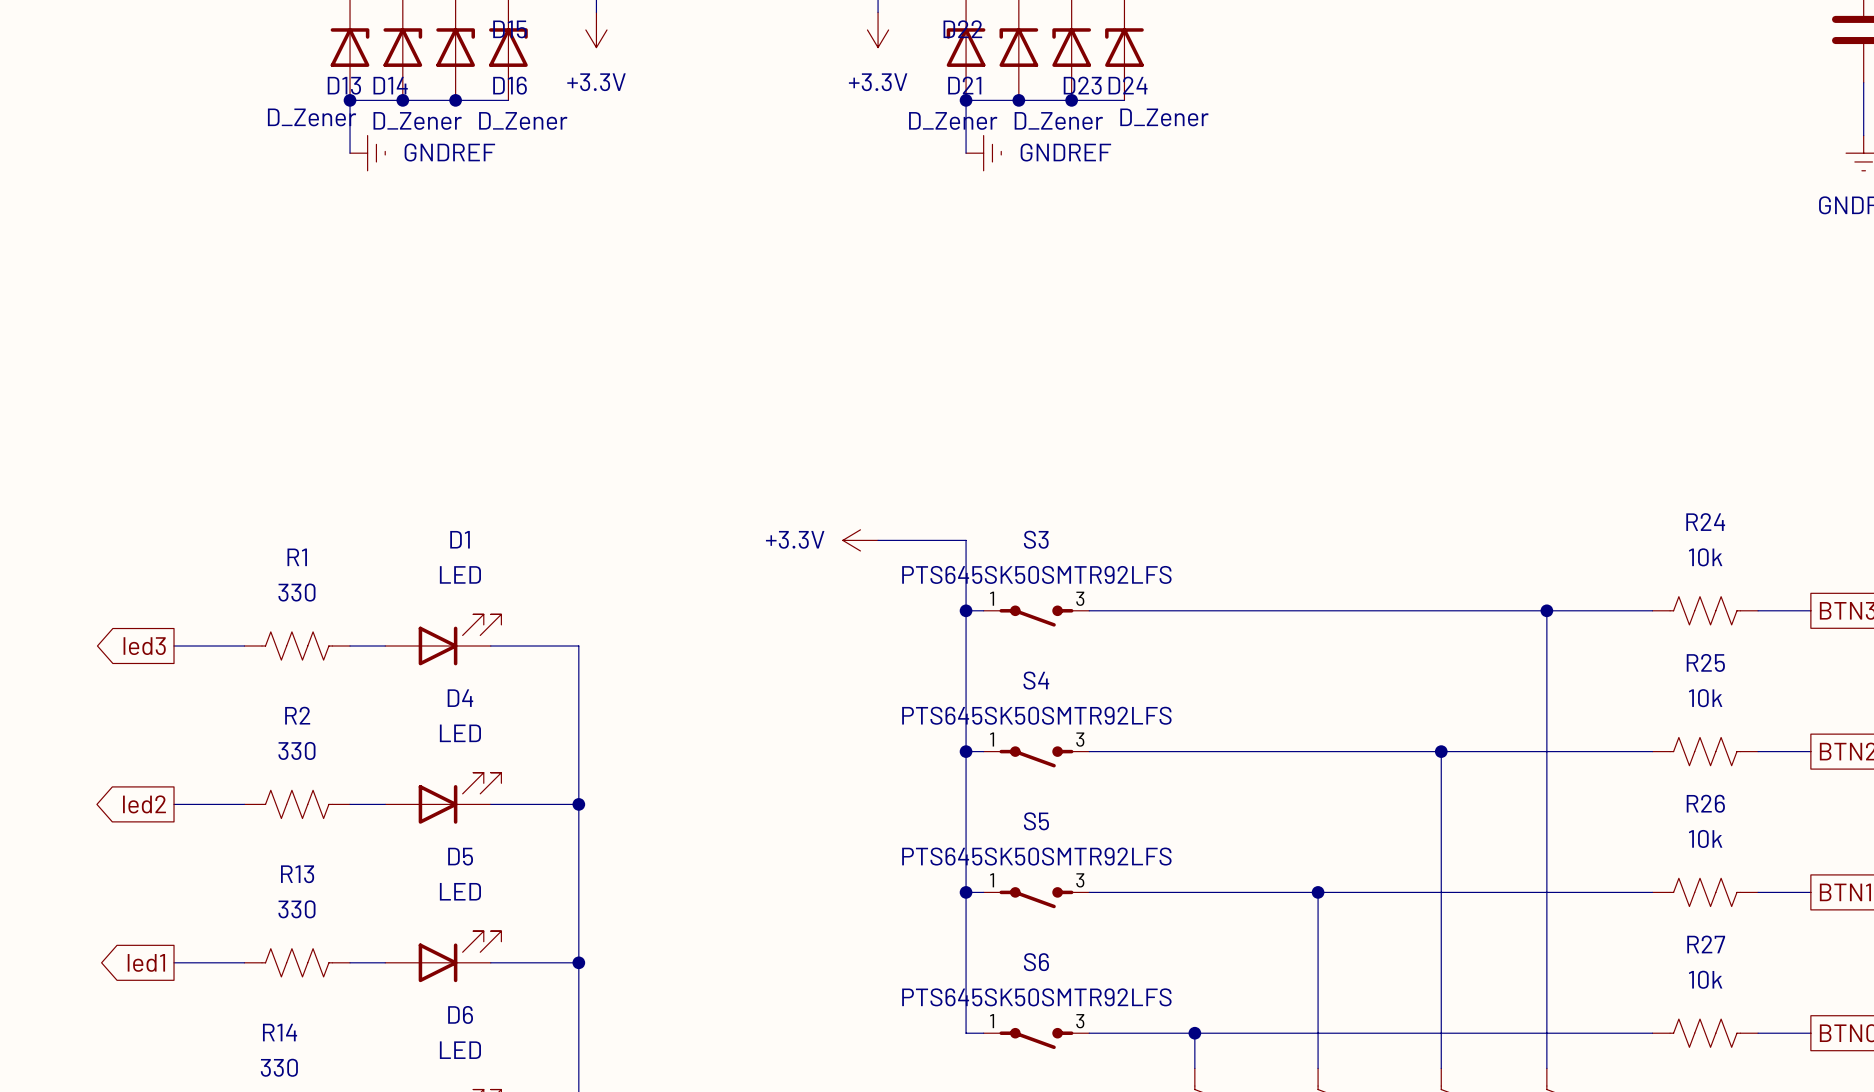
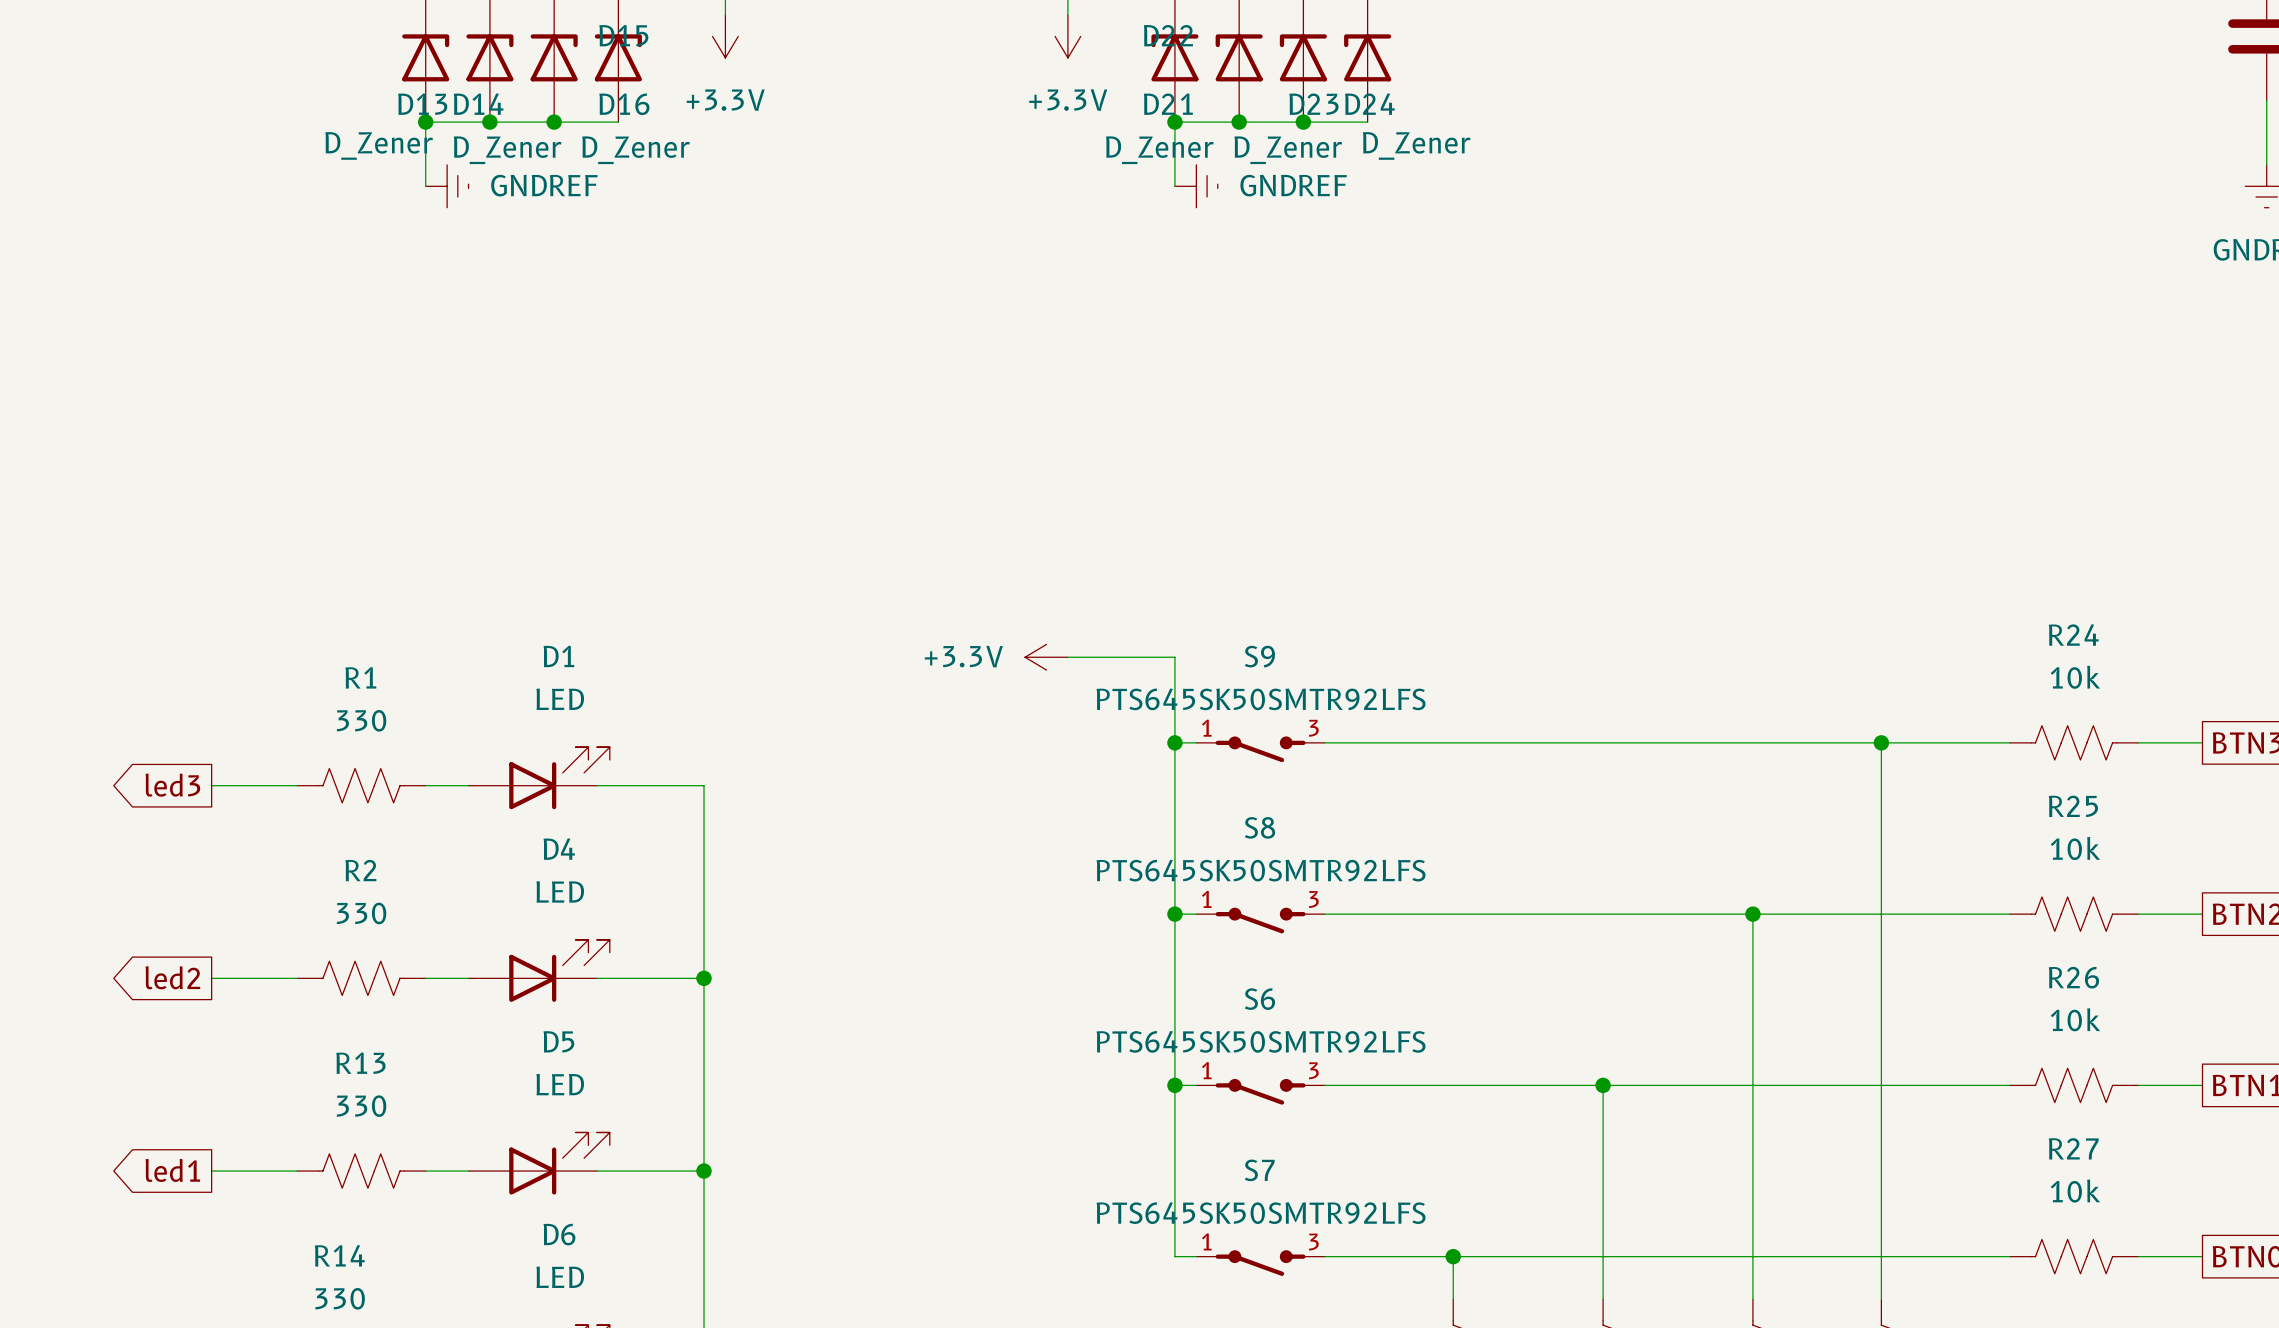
S3 name: S3 (1036, 539) -> S9 (1259, 656)
S4 name: S4 (1036, 680) -> S8 (1259, 827)
S5 name: S5 (1036, 821) -> S6 (1259, 999)
S6 name: S6 (1036, 962) -> S7 (1259, 1170)

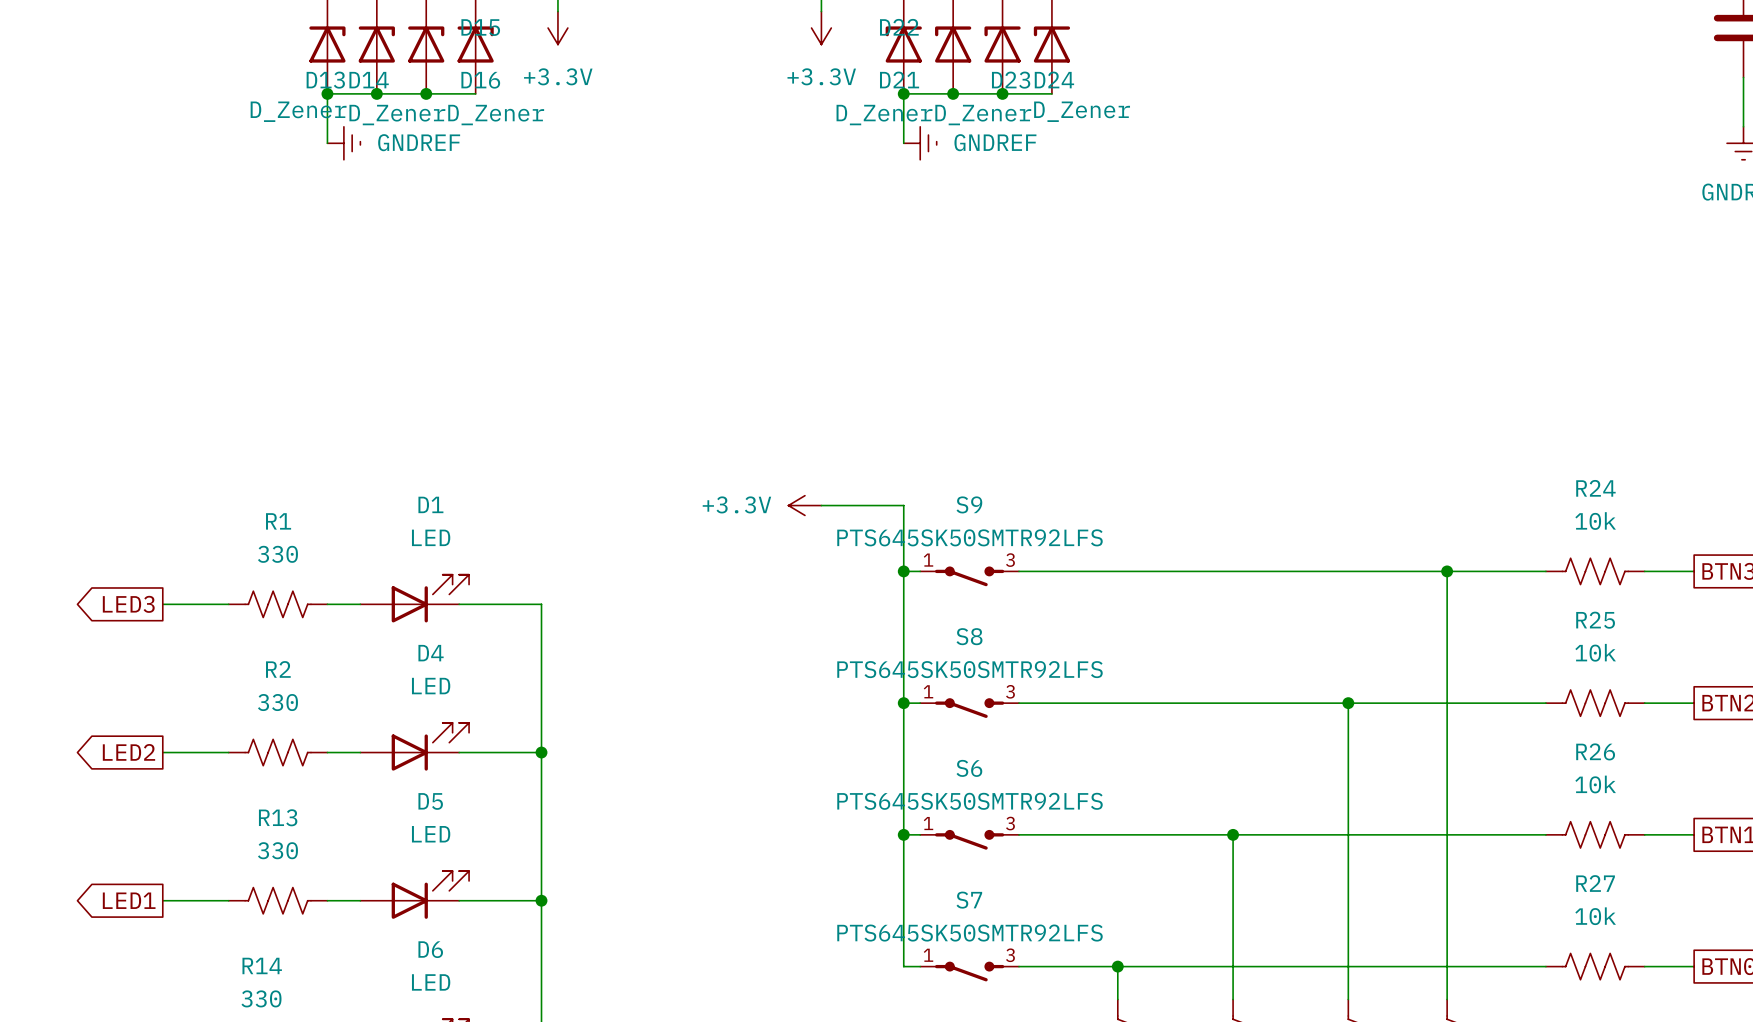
global label: led3 (172, 785) -> LED3 (128, 604)
global label: led2 (172, 977) -> LED2 (128, 752)
global label: led1 (172, 1170) -> LED1 (129, 900)

